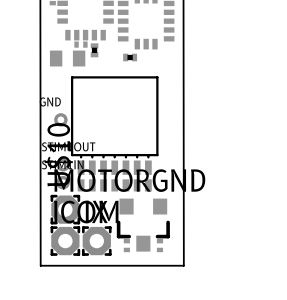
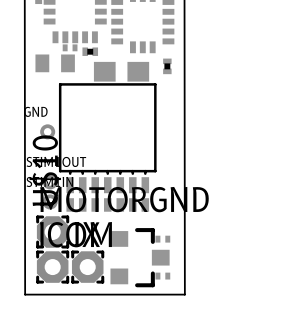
part rotation: 0° (94, 50) -> 90° clockwise (90, 51)
part footprint: [123, 53, 138, 62] -> [93, 61, 150, 82]
part: none -> (167, 66)
part rotation: 0° (143, 225) -> 90° counterclockwise (140, 257)
part rotation: 0° (126, 245) -> 90° clockwise (162, 239)
part position: (126, 245) -> (162, 239)
part rotation: 0° (159, 245) -> 90° clockwise (162, 276)

